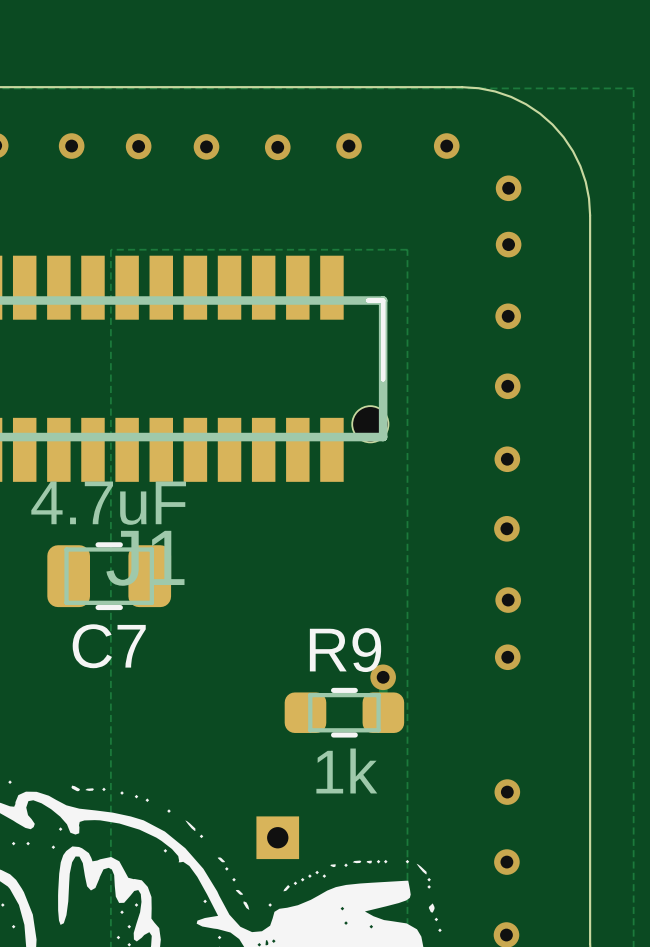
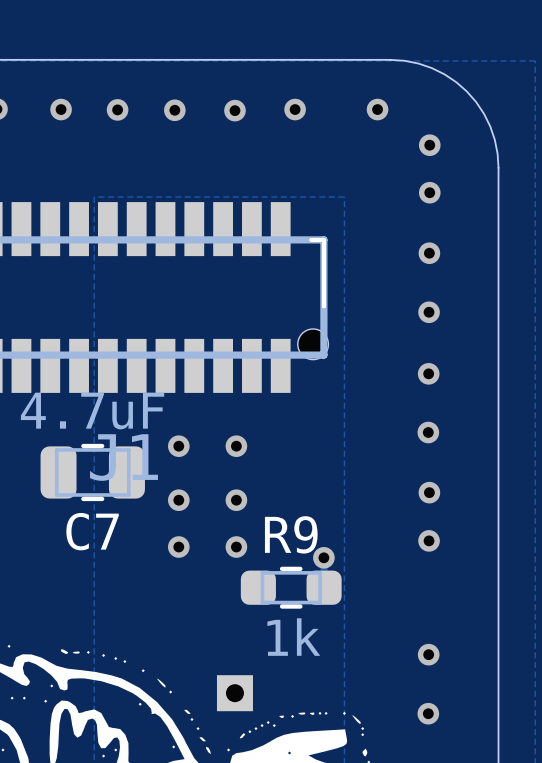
via: none -> (178, 446)
via: none -> (236, 446)
via: none -> (178, 500)
via: none -> (236, 500)
via: none -> (178, 547)
via: none -> (236, 547)

